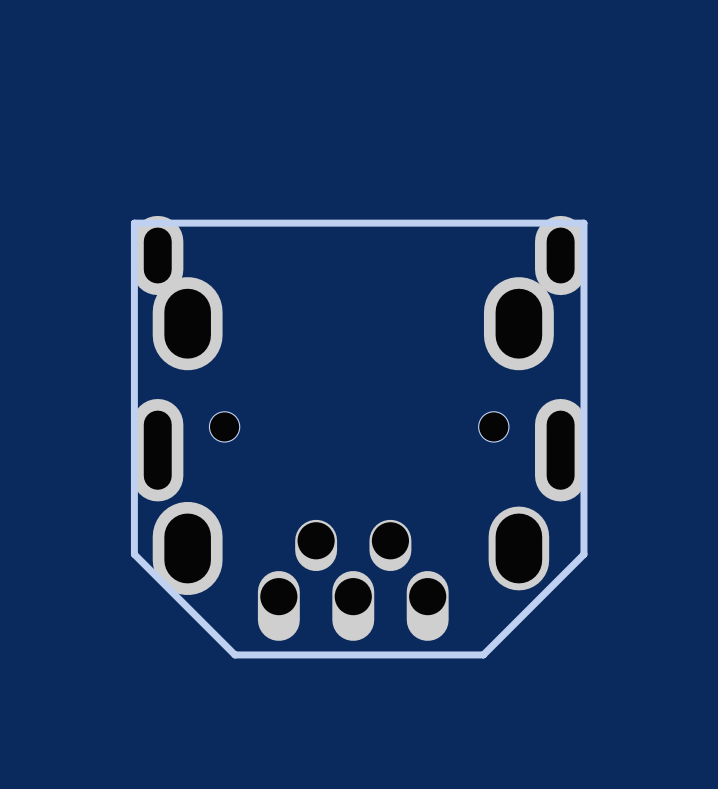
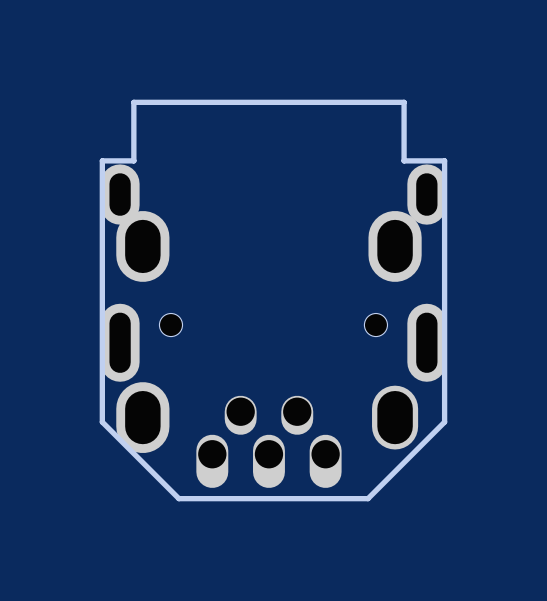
board edge: (583, 223) (134, 223) -> (444, 169) (444, 160) (404, 160) (404, 102) (133, 102) (133, 160) (102, 160) (102, 169)

